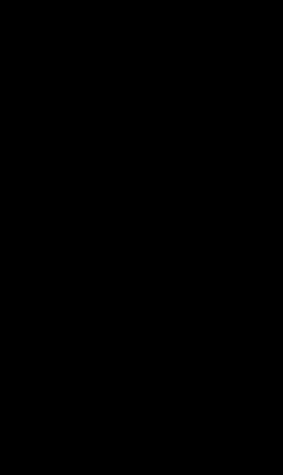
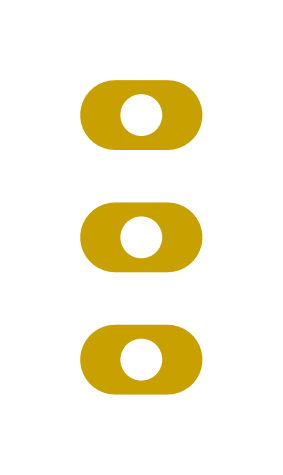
part: none -> (141, 237)

